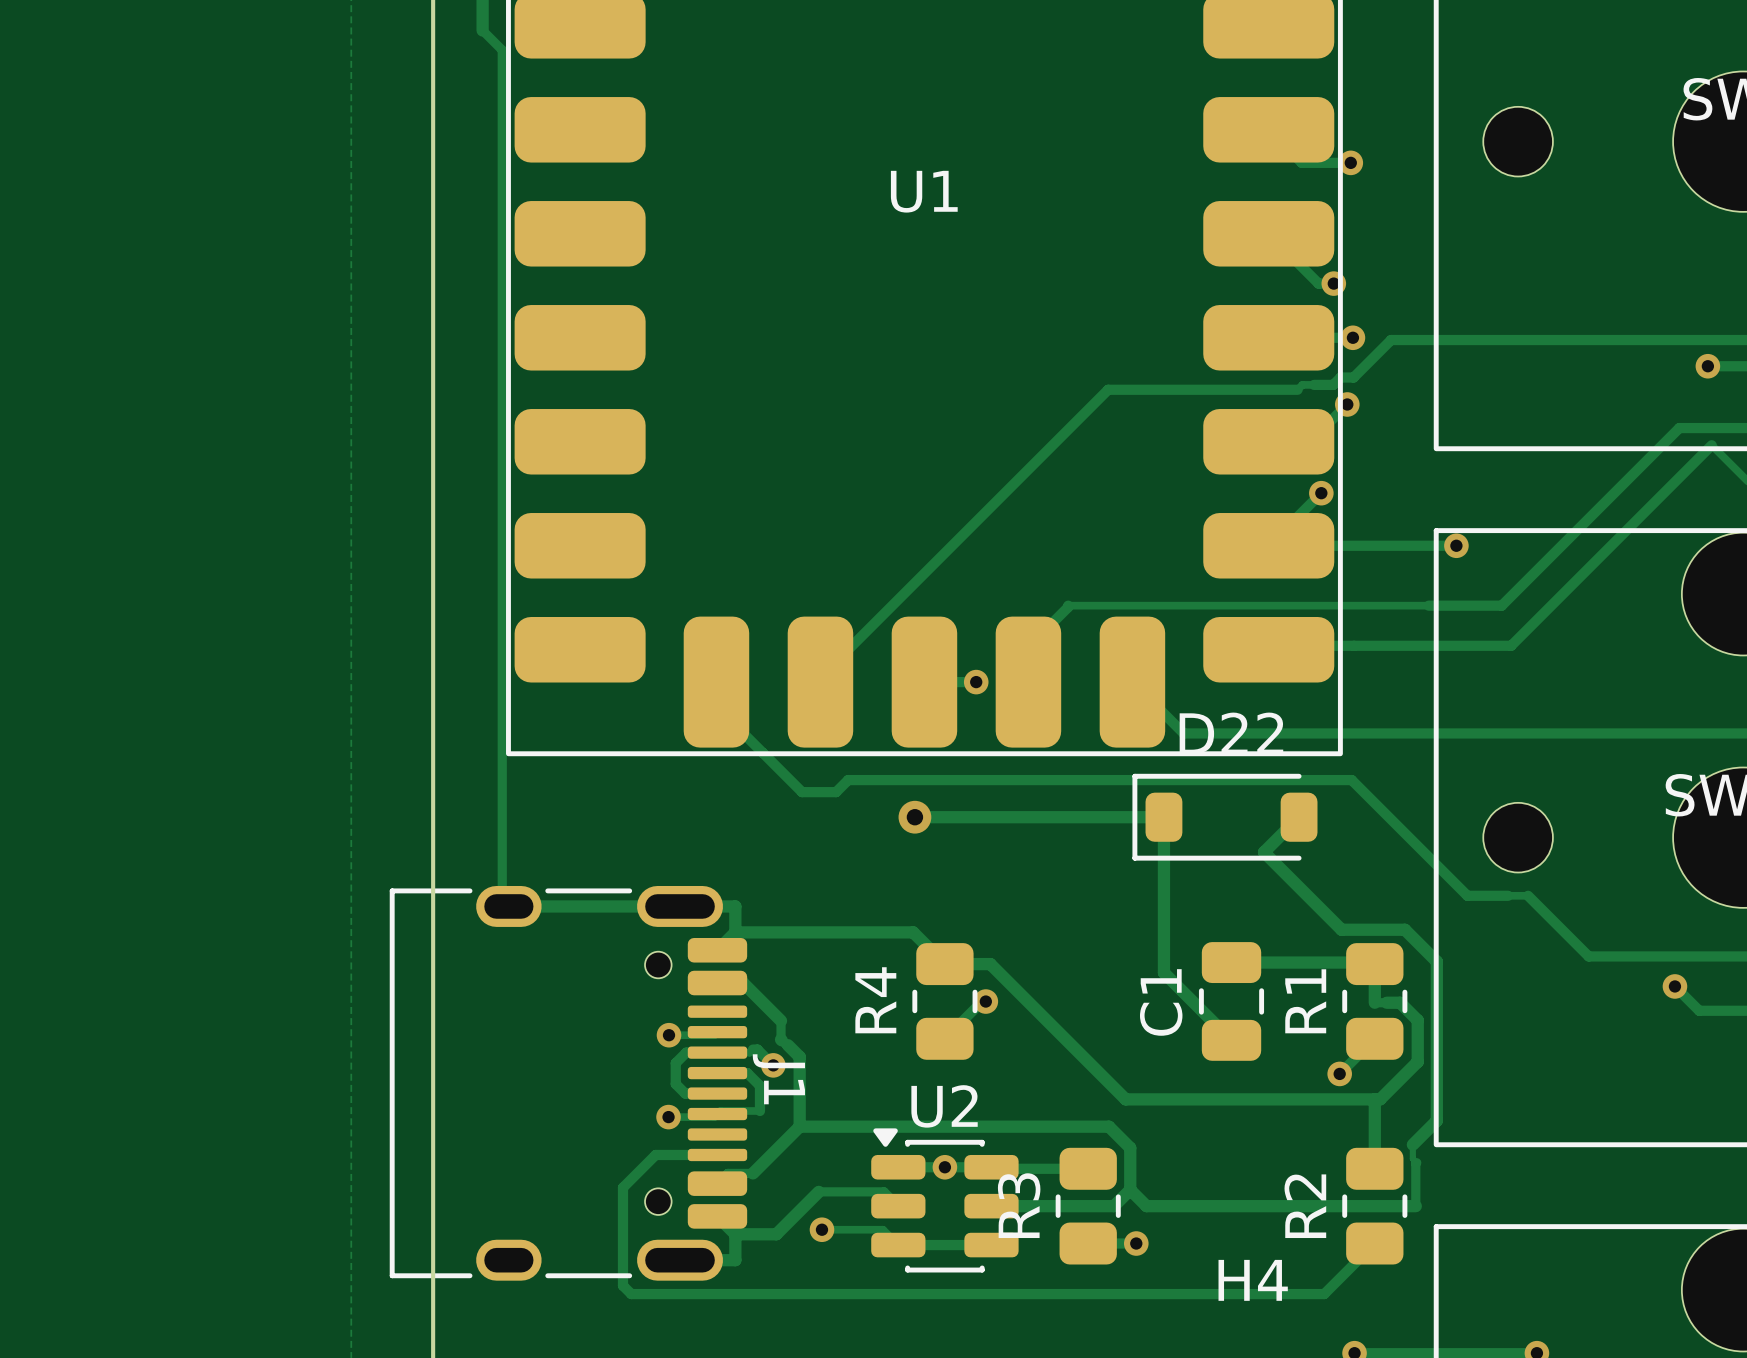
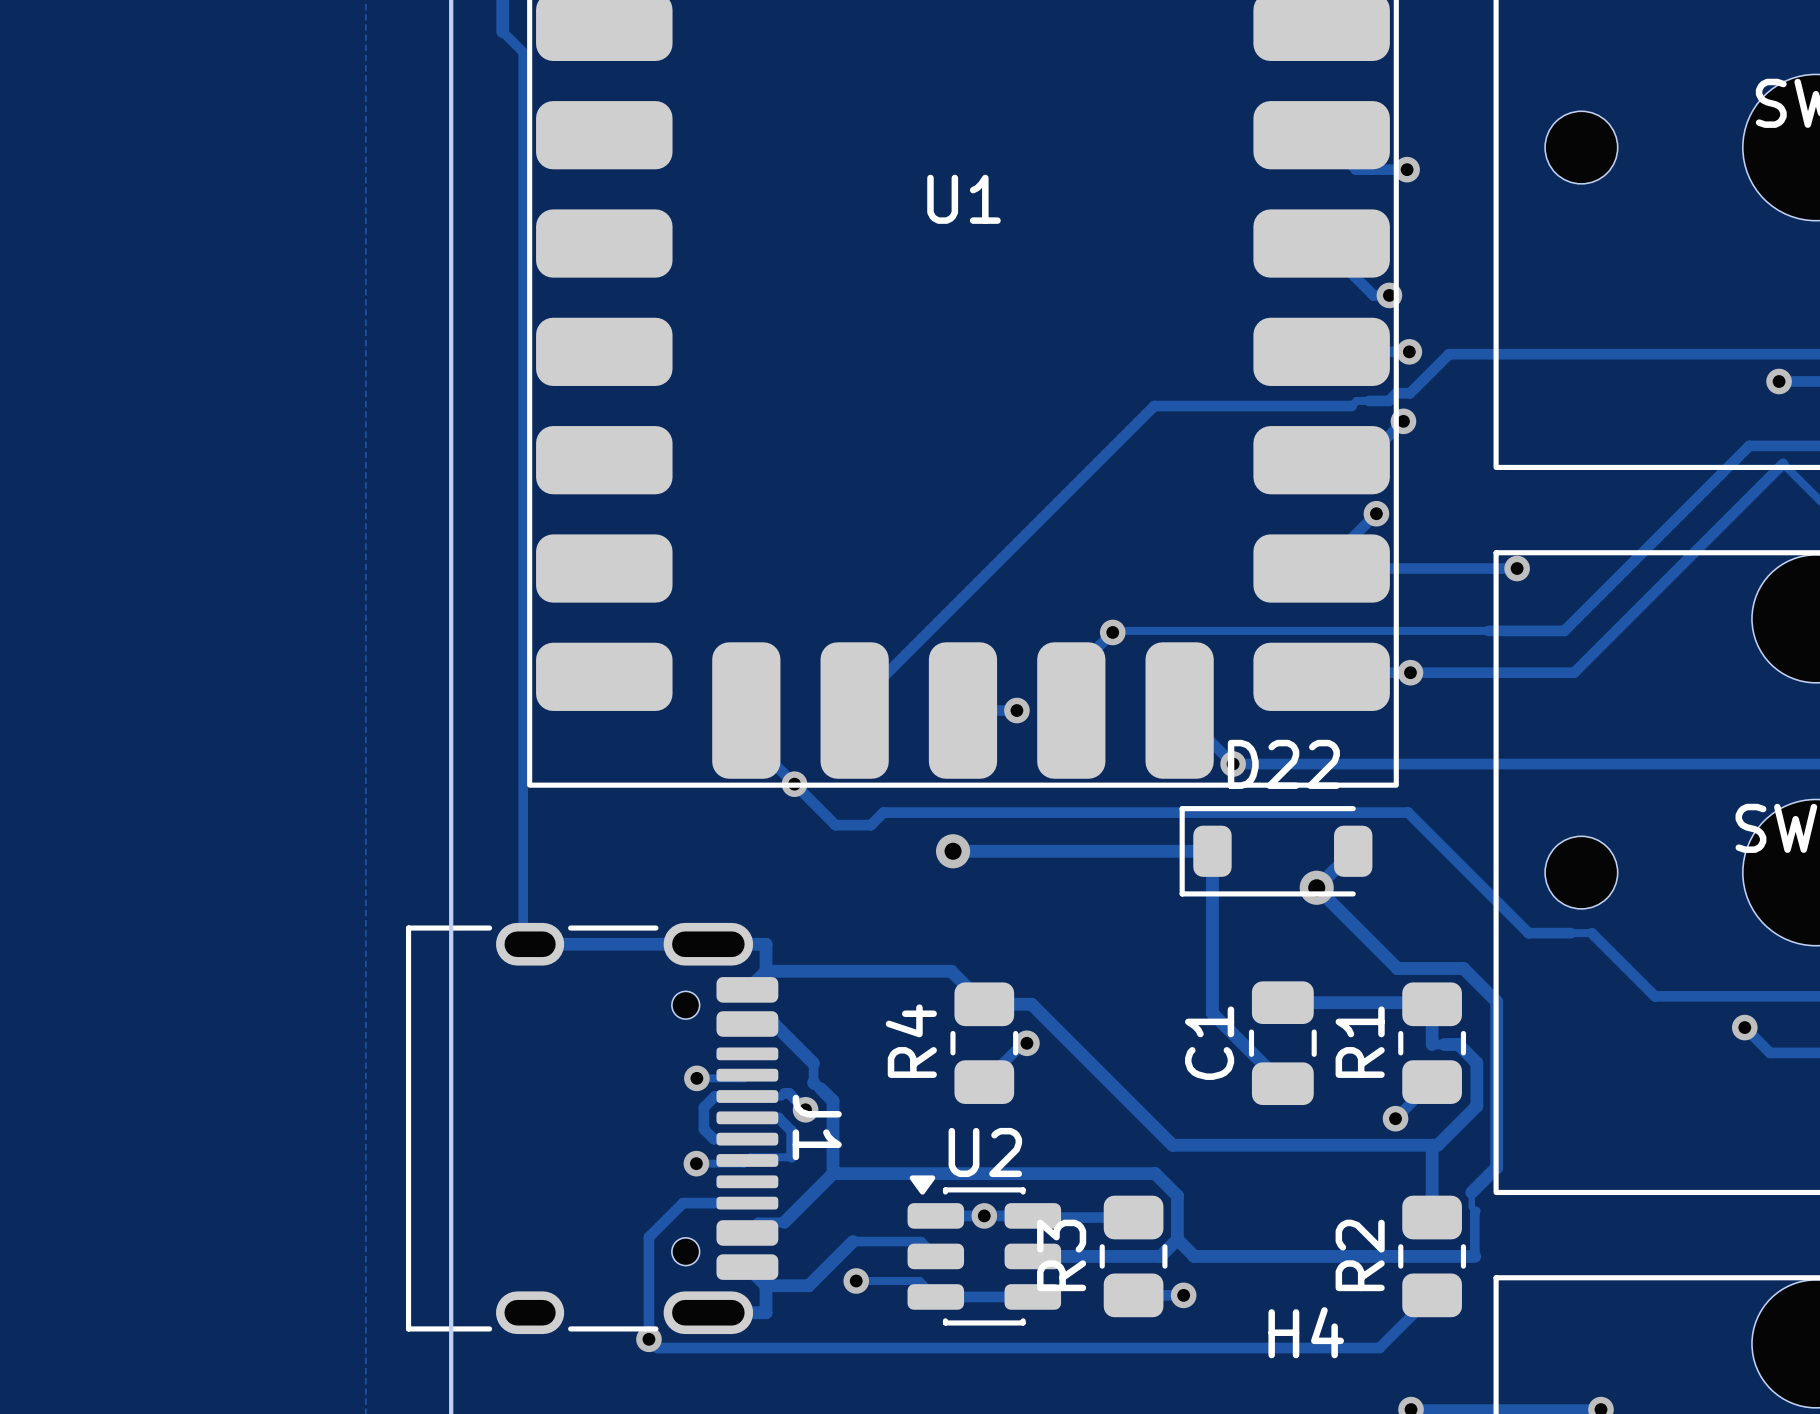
via: none -> (1112, 632)
via: none -> (1410, 672)
via: none -> (1233, 764)
via: none -> (794, 784)
via: none -> (1316, 887)
via: none -> (648, 1339)

